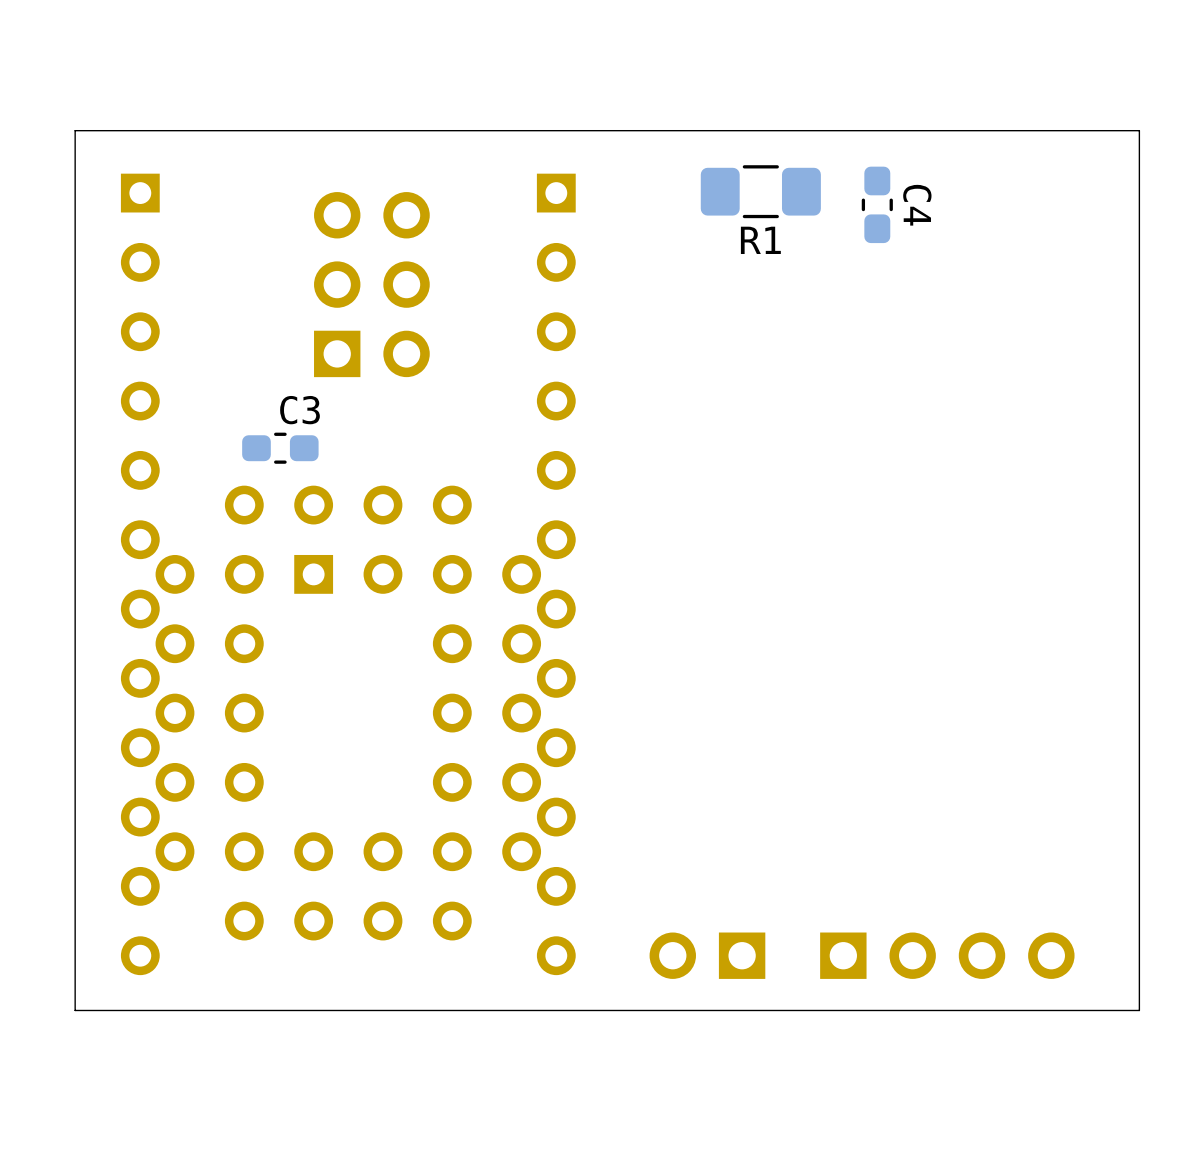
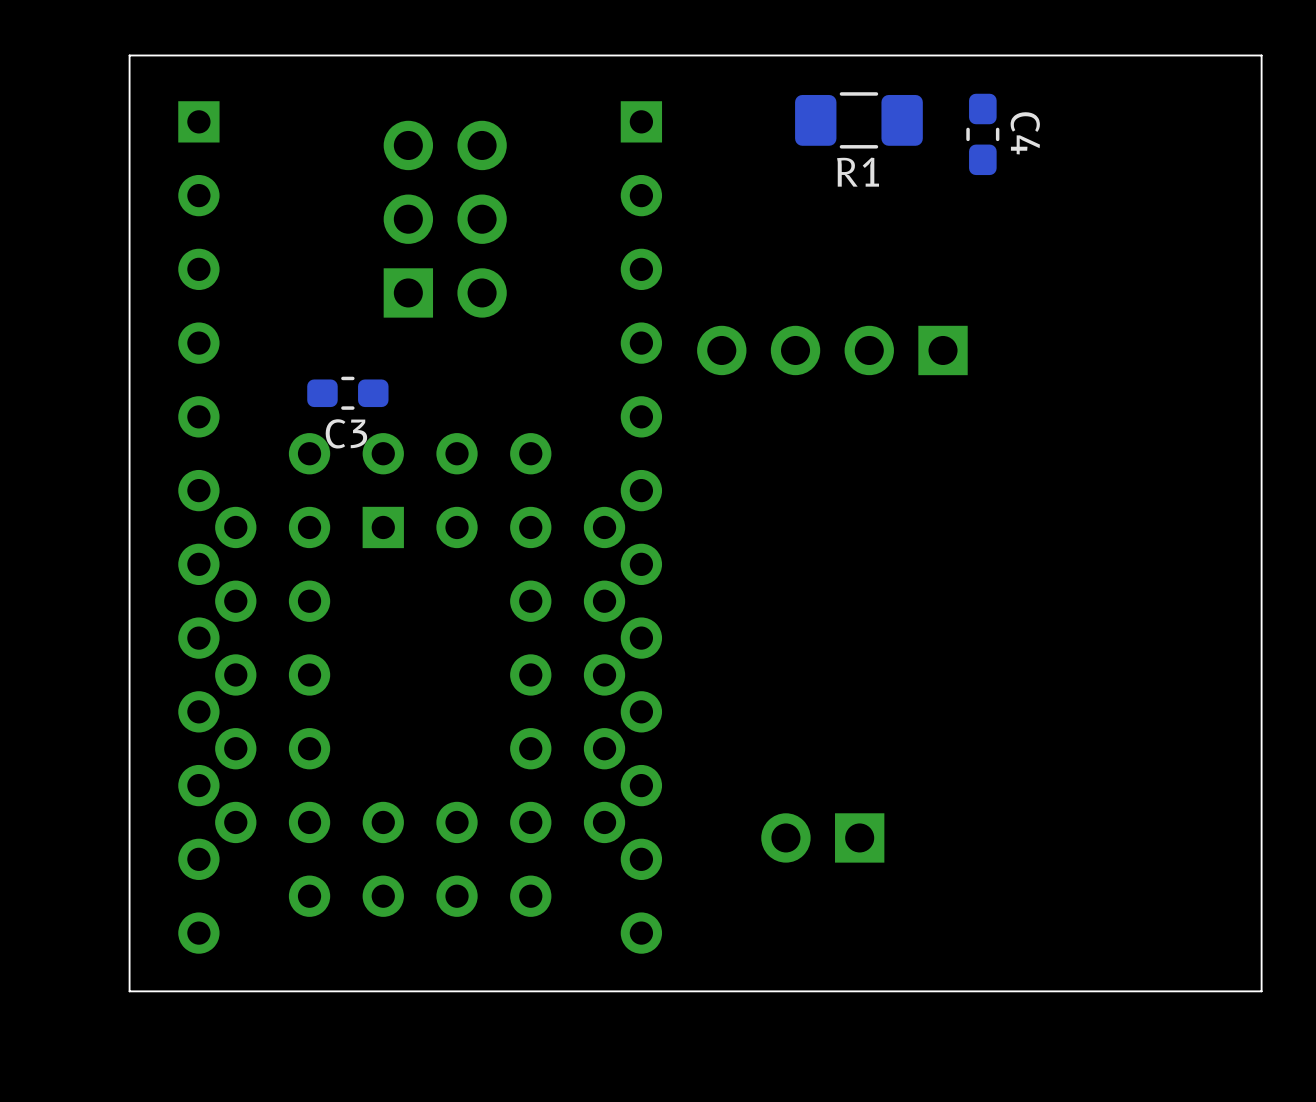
C3 name position: C3 (299, 410) -> C3 (346, 433)
part position: (707, 955) -> (822, 837)
part rotation: 0° (947, 955) -> 180° (832, 350)
part position: (947, 955) -> (832, 350)

